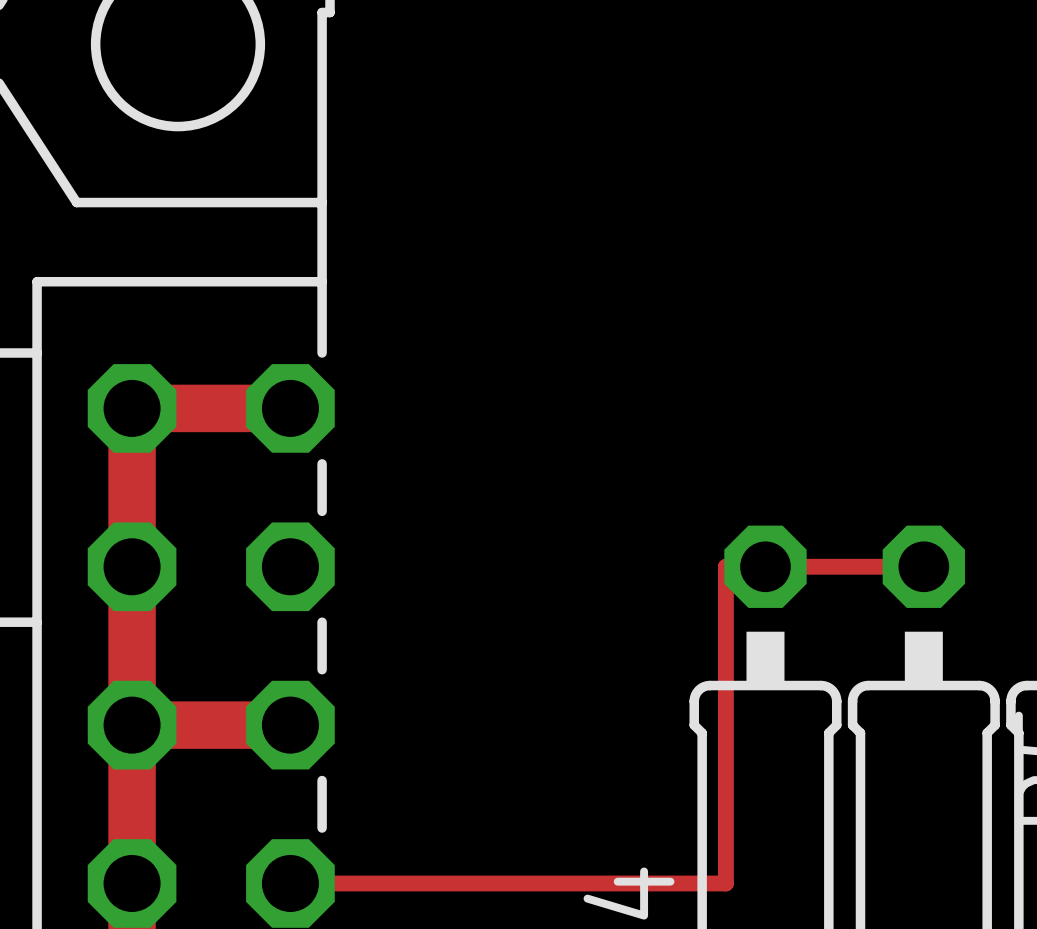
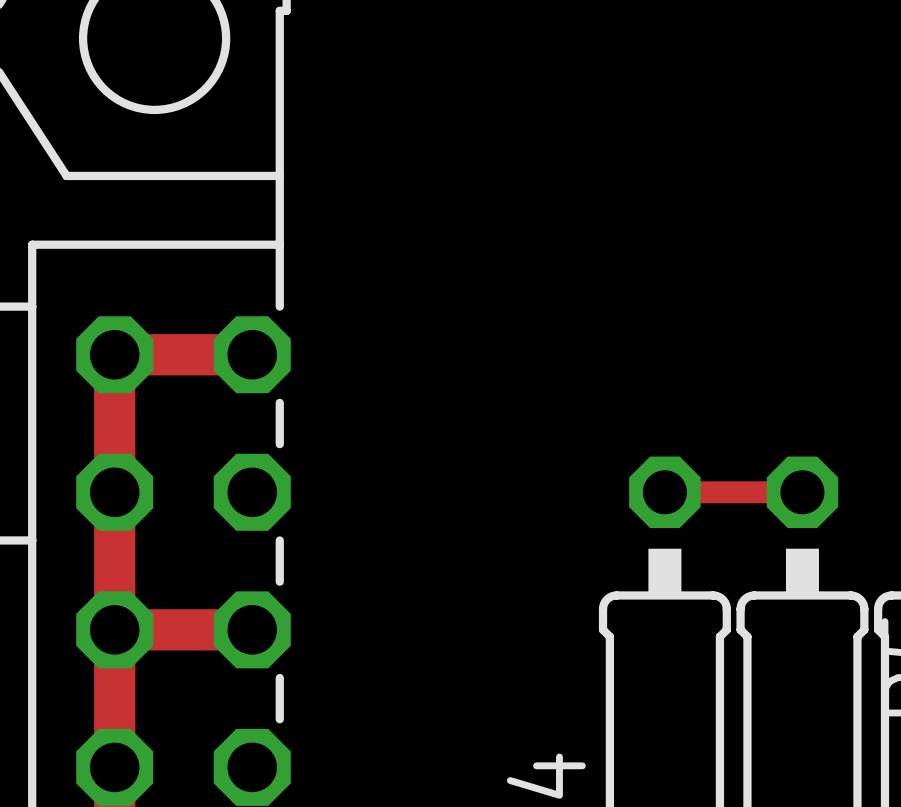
track: (765, 566) (725, 566) (725, 883) (290, 883) -> none
track width: thin (765, 566) (923, 566) -> thick (664, 492) (802, 492)

